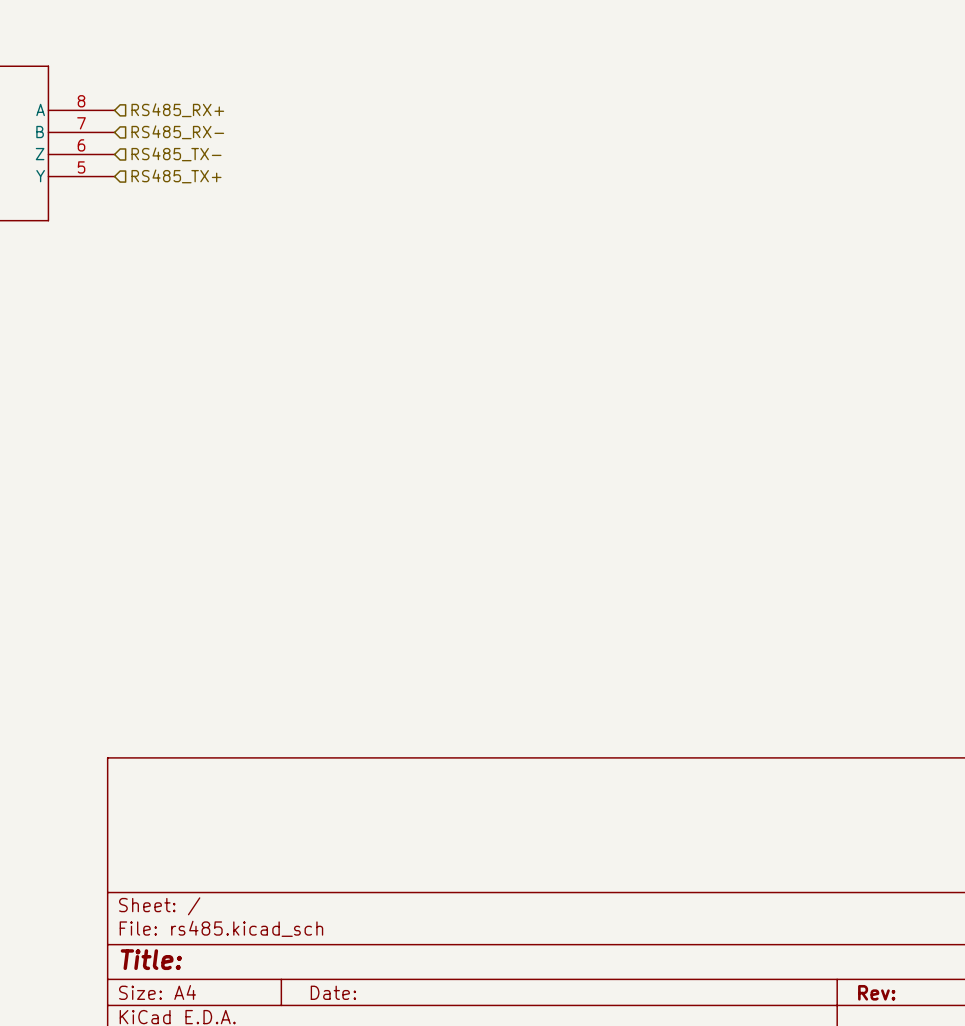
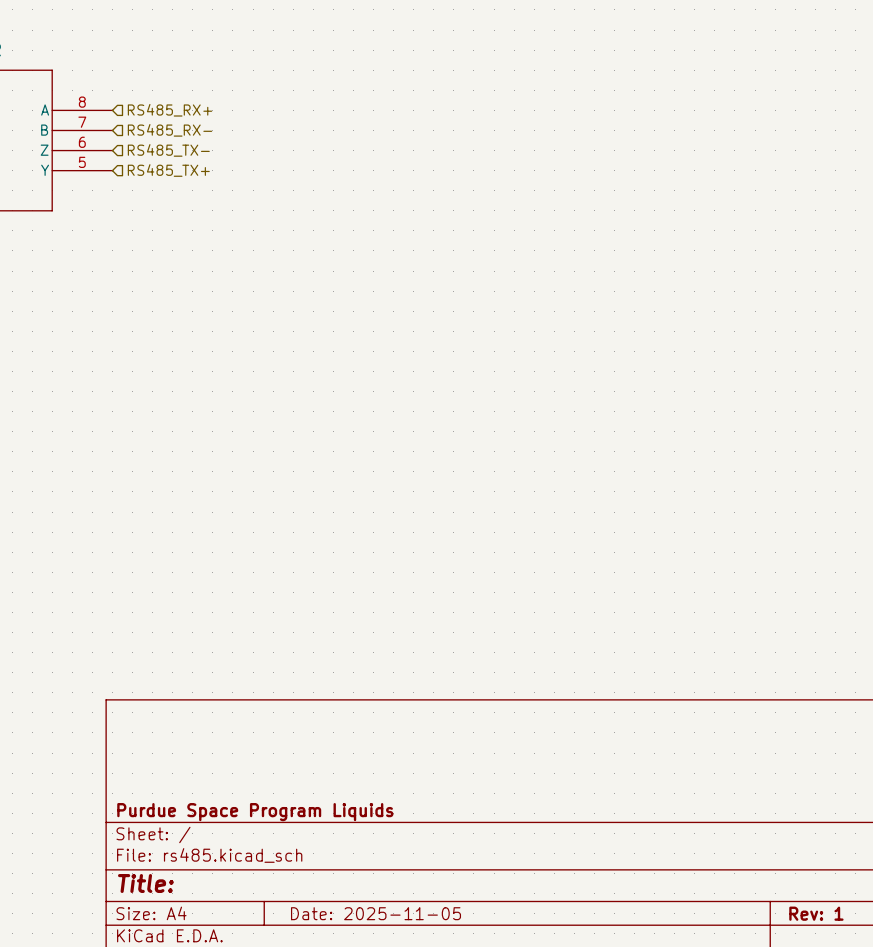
title block: none -> Purdue Space Program Liquids (255, 812)
title block: Date: (333, 992) -> Date: 2025-11-05 (376, 913)
title block: Rev: (876, 992) -> Rev: 1 (816, 913)

